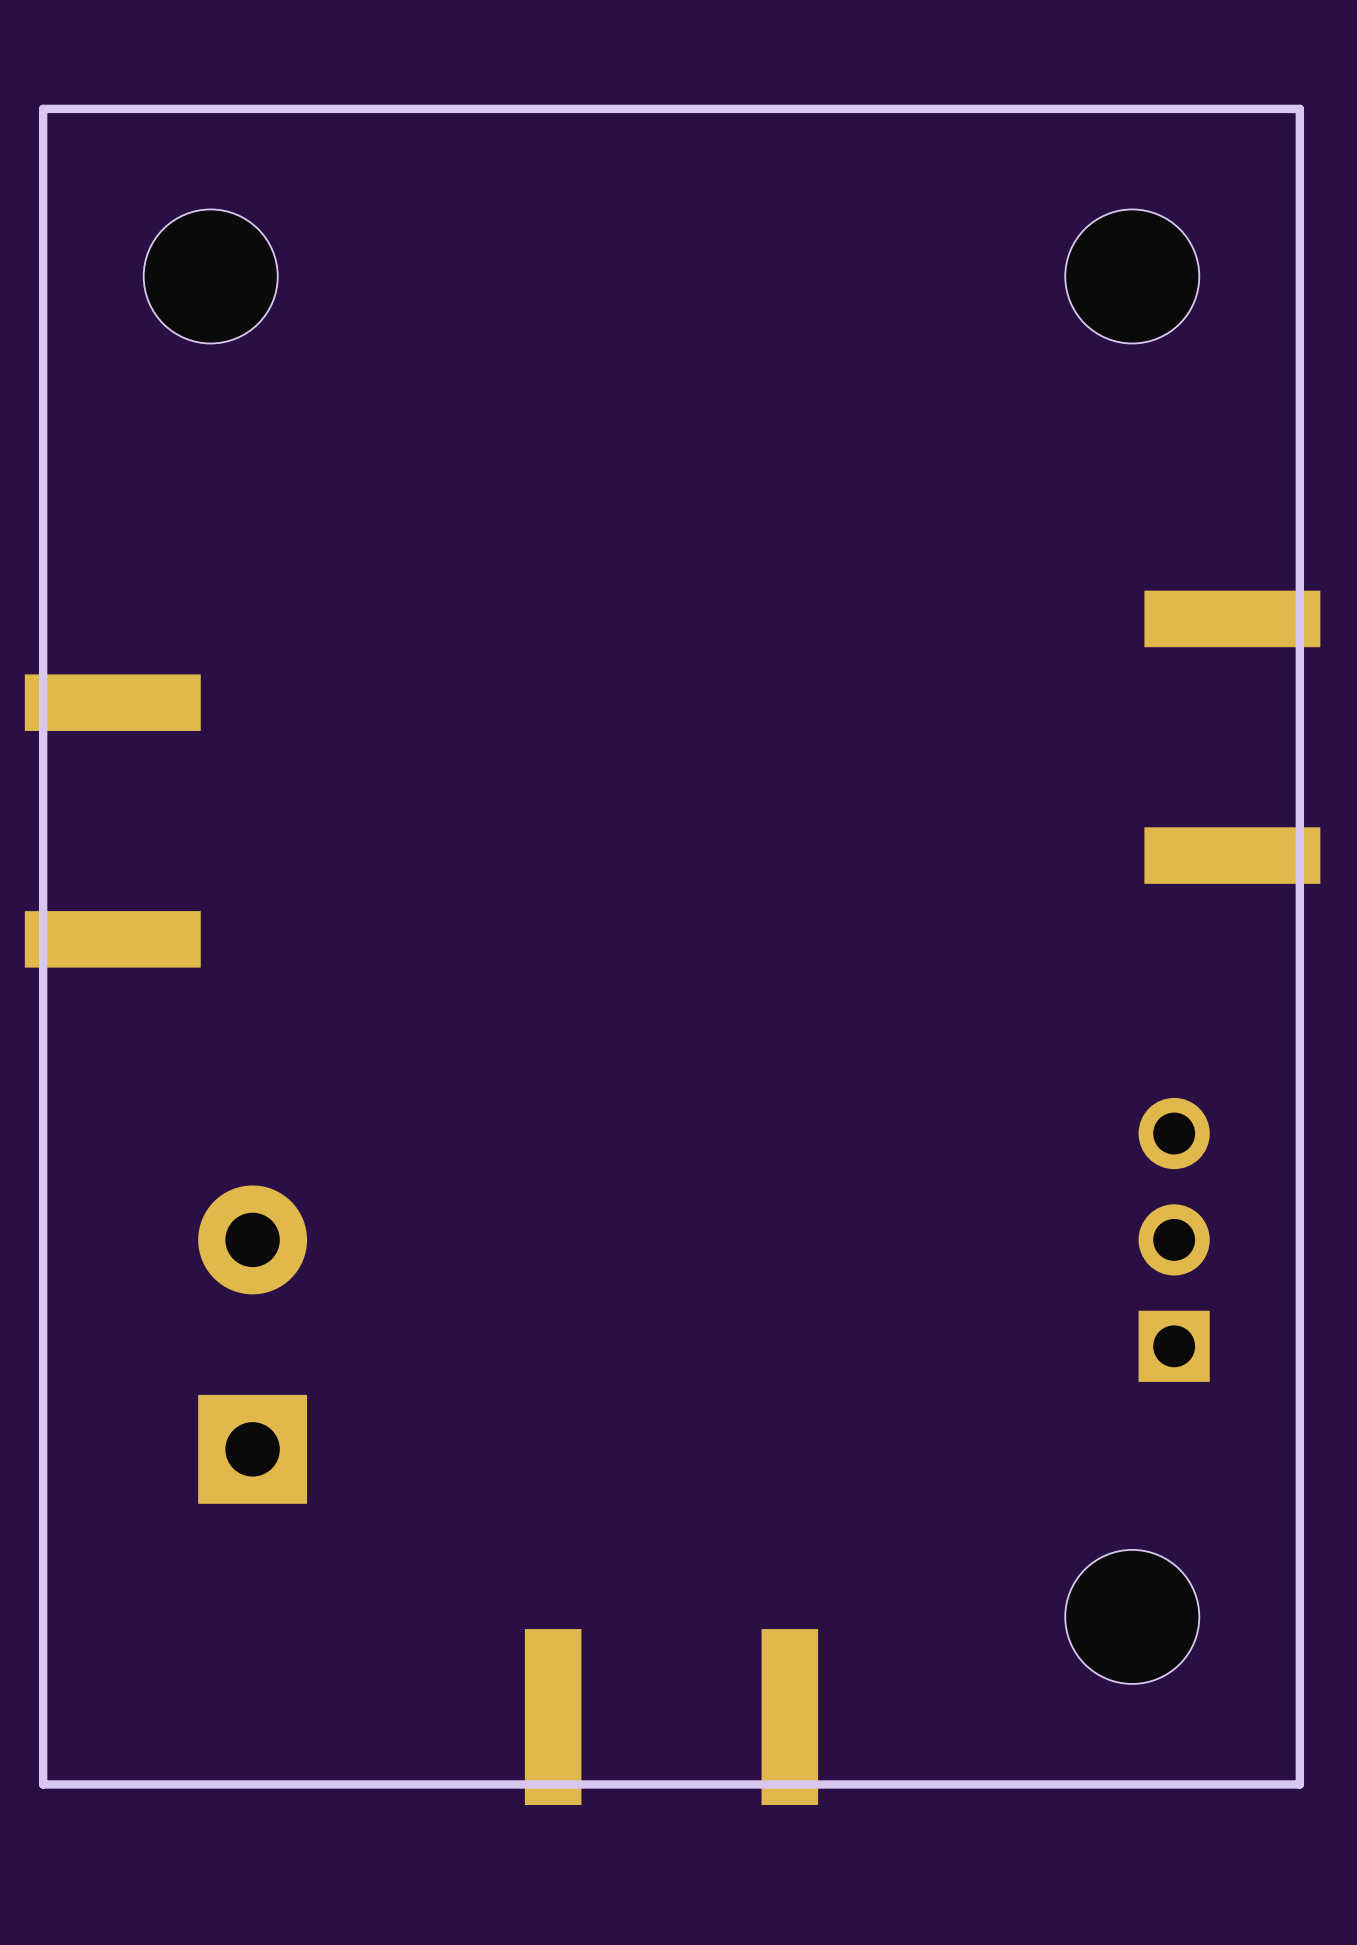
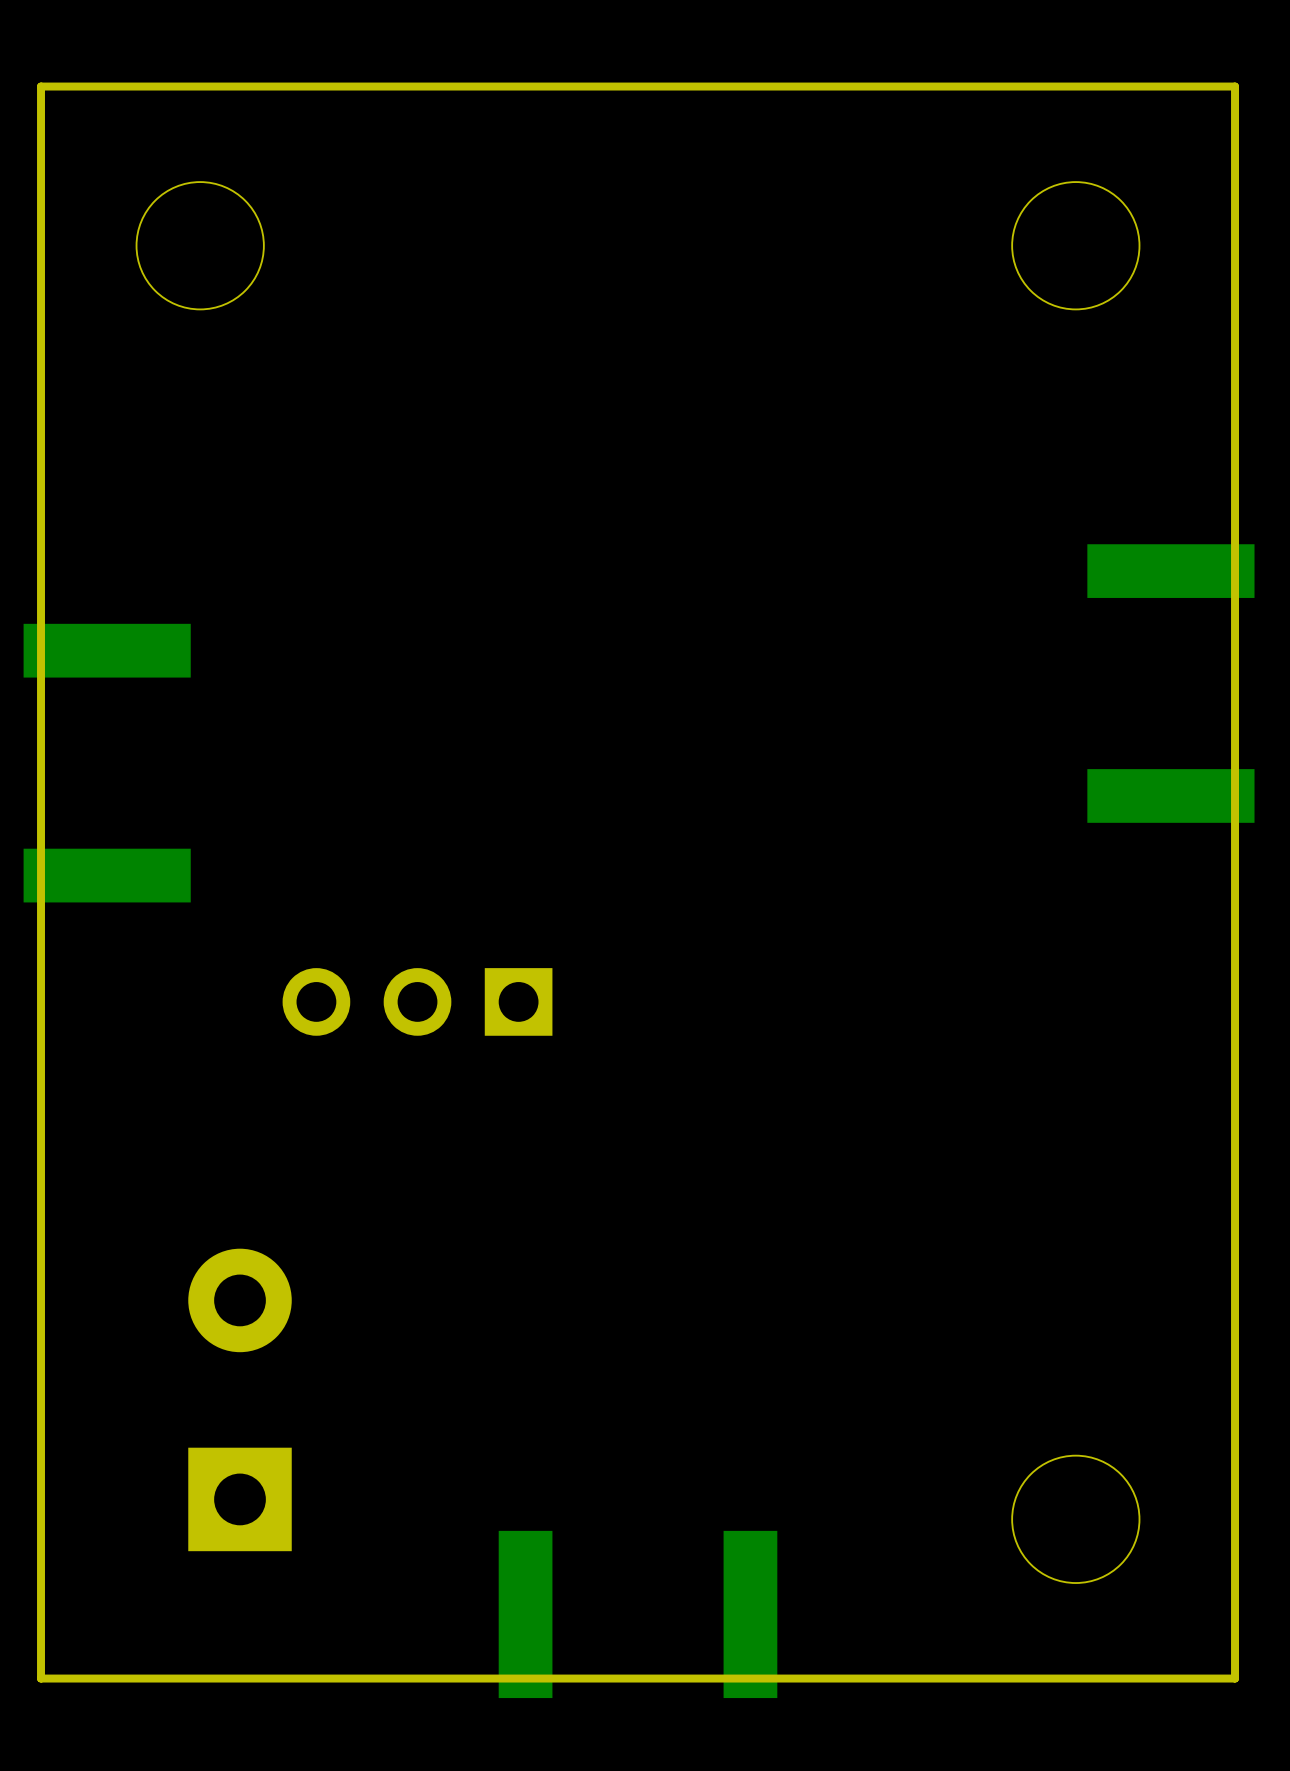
part rotation: 0° (1174, 1239) -> 90° counterclockwise (417, 1001)
part position: (1174, 1239) -> (417, 1001)
part position: (252, 1344) -> (240, 1399)

